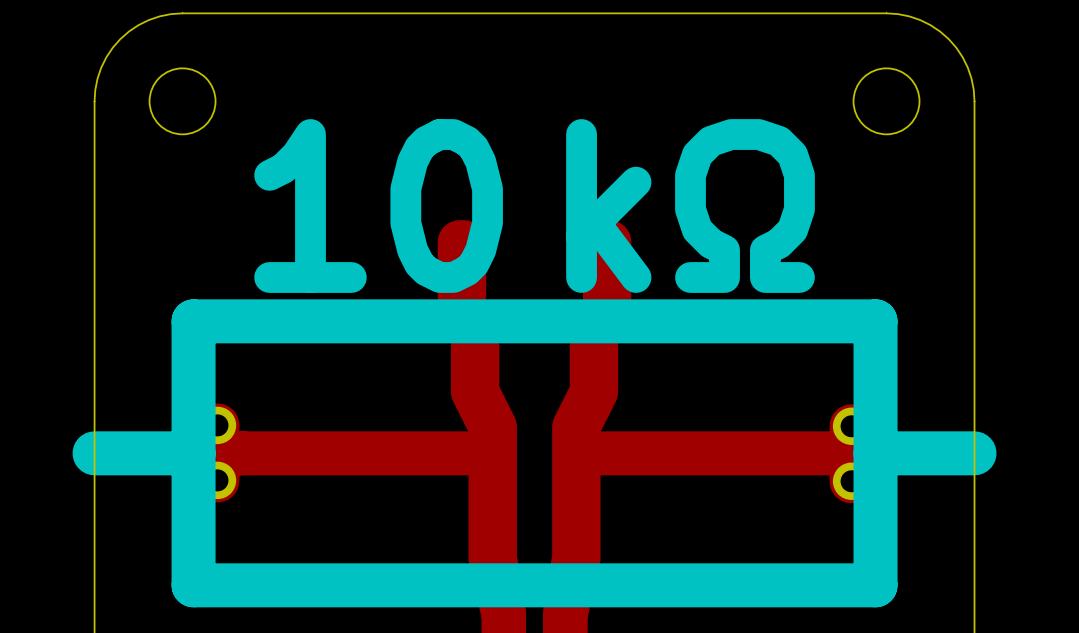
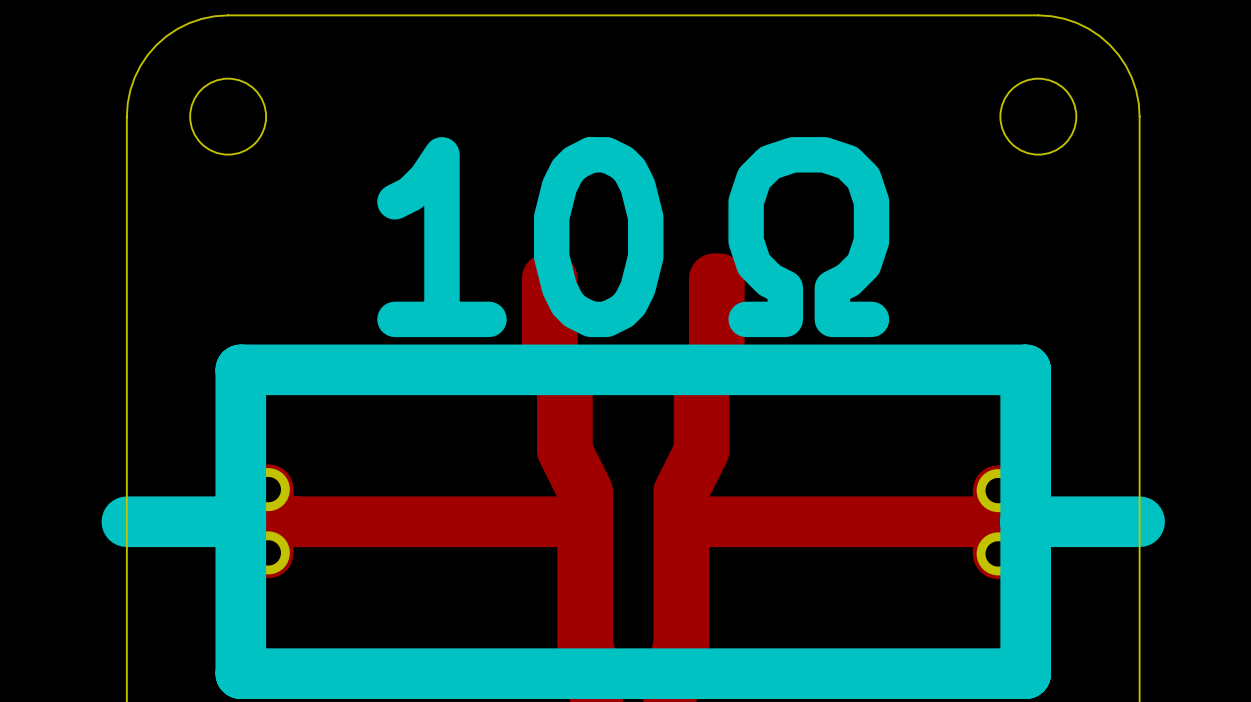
text: 10 kΩ (534, 206) -> 10 Ω (633, 237)

